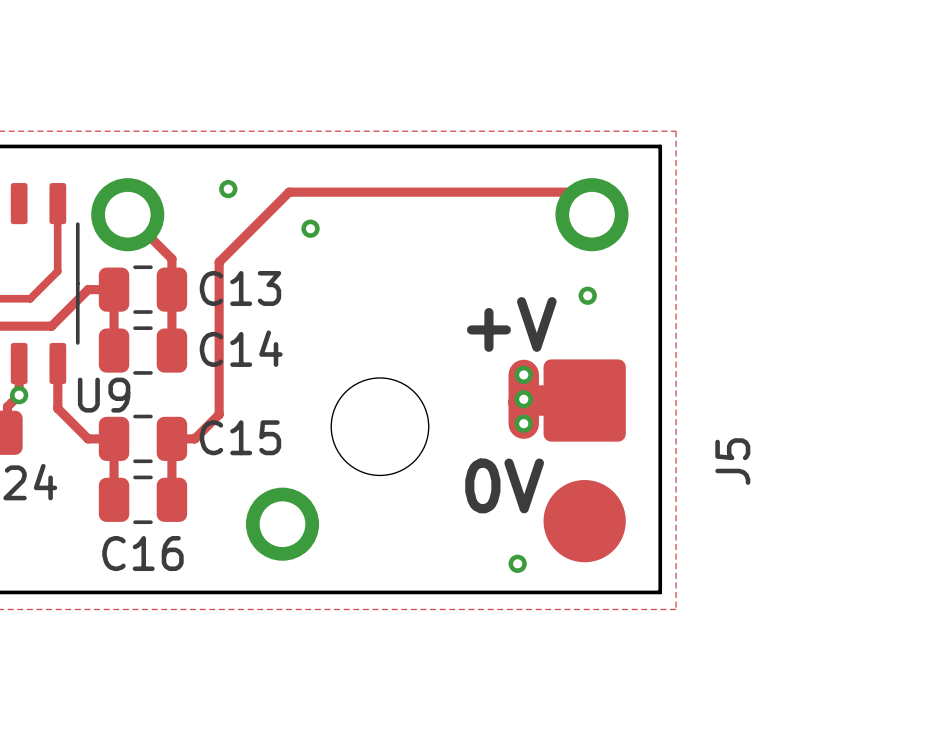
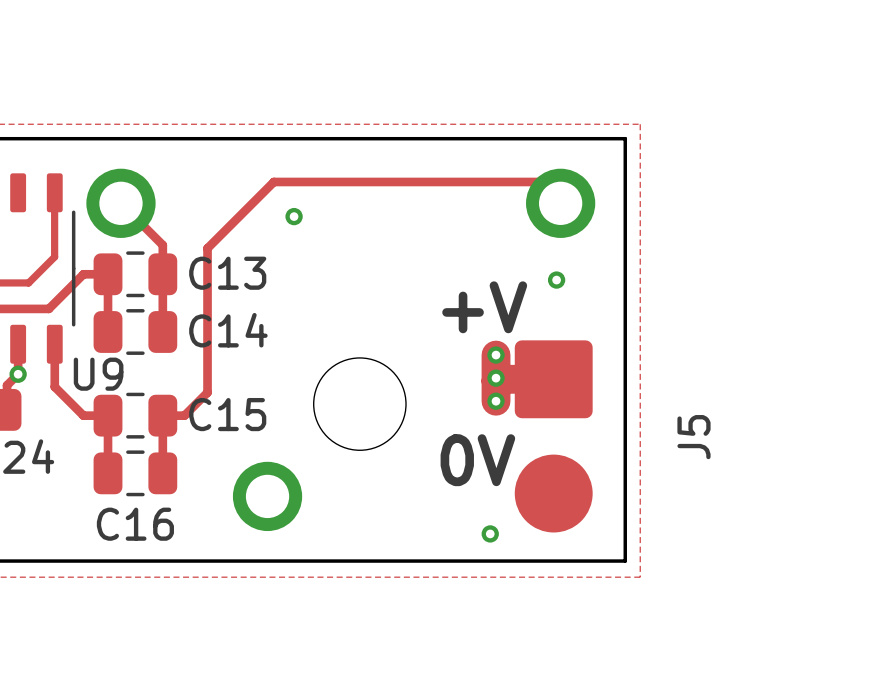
via: (228, 189) -> none

